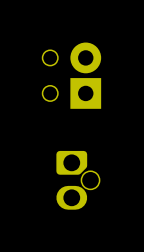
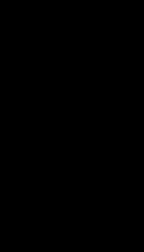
part: (71, 75) -> none
part: (77, 180) -> none

